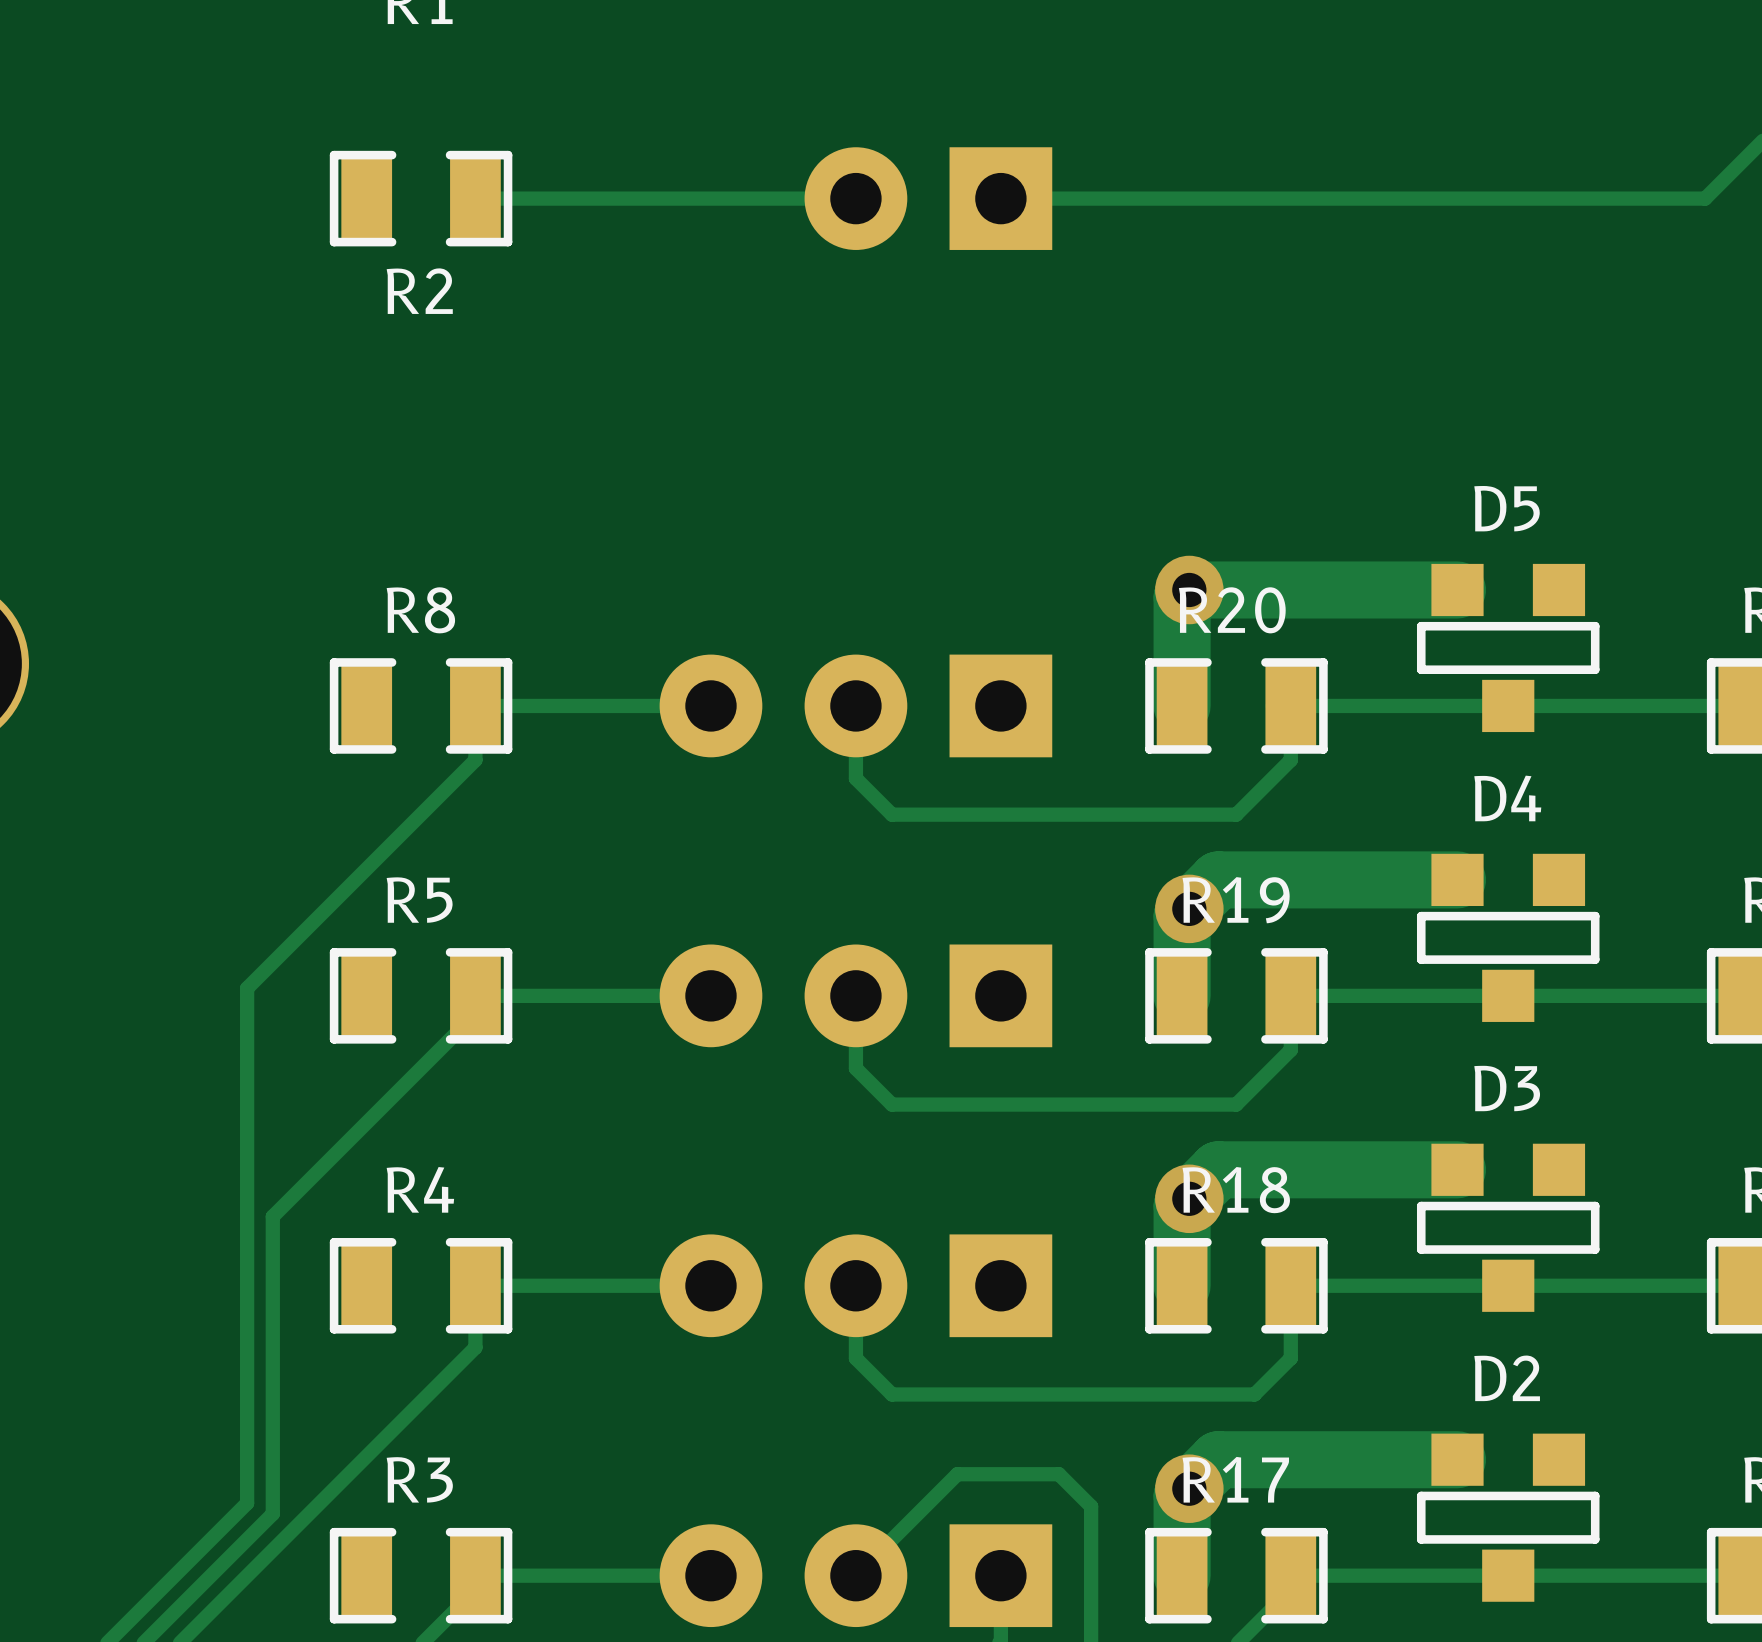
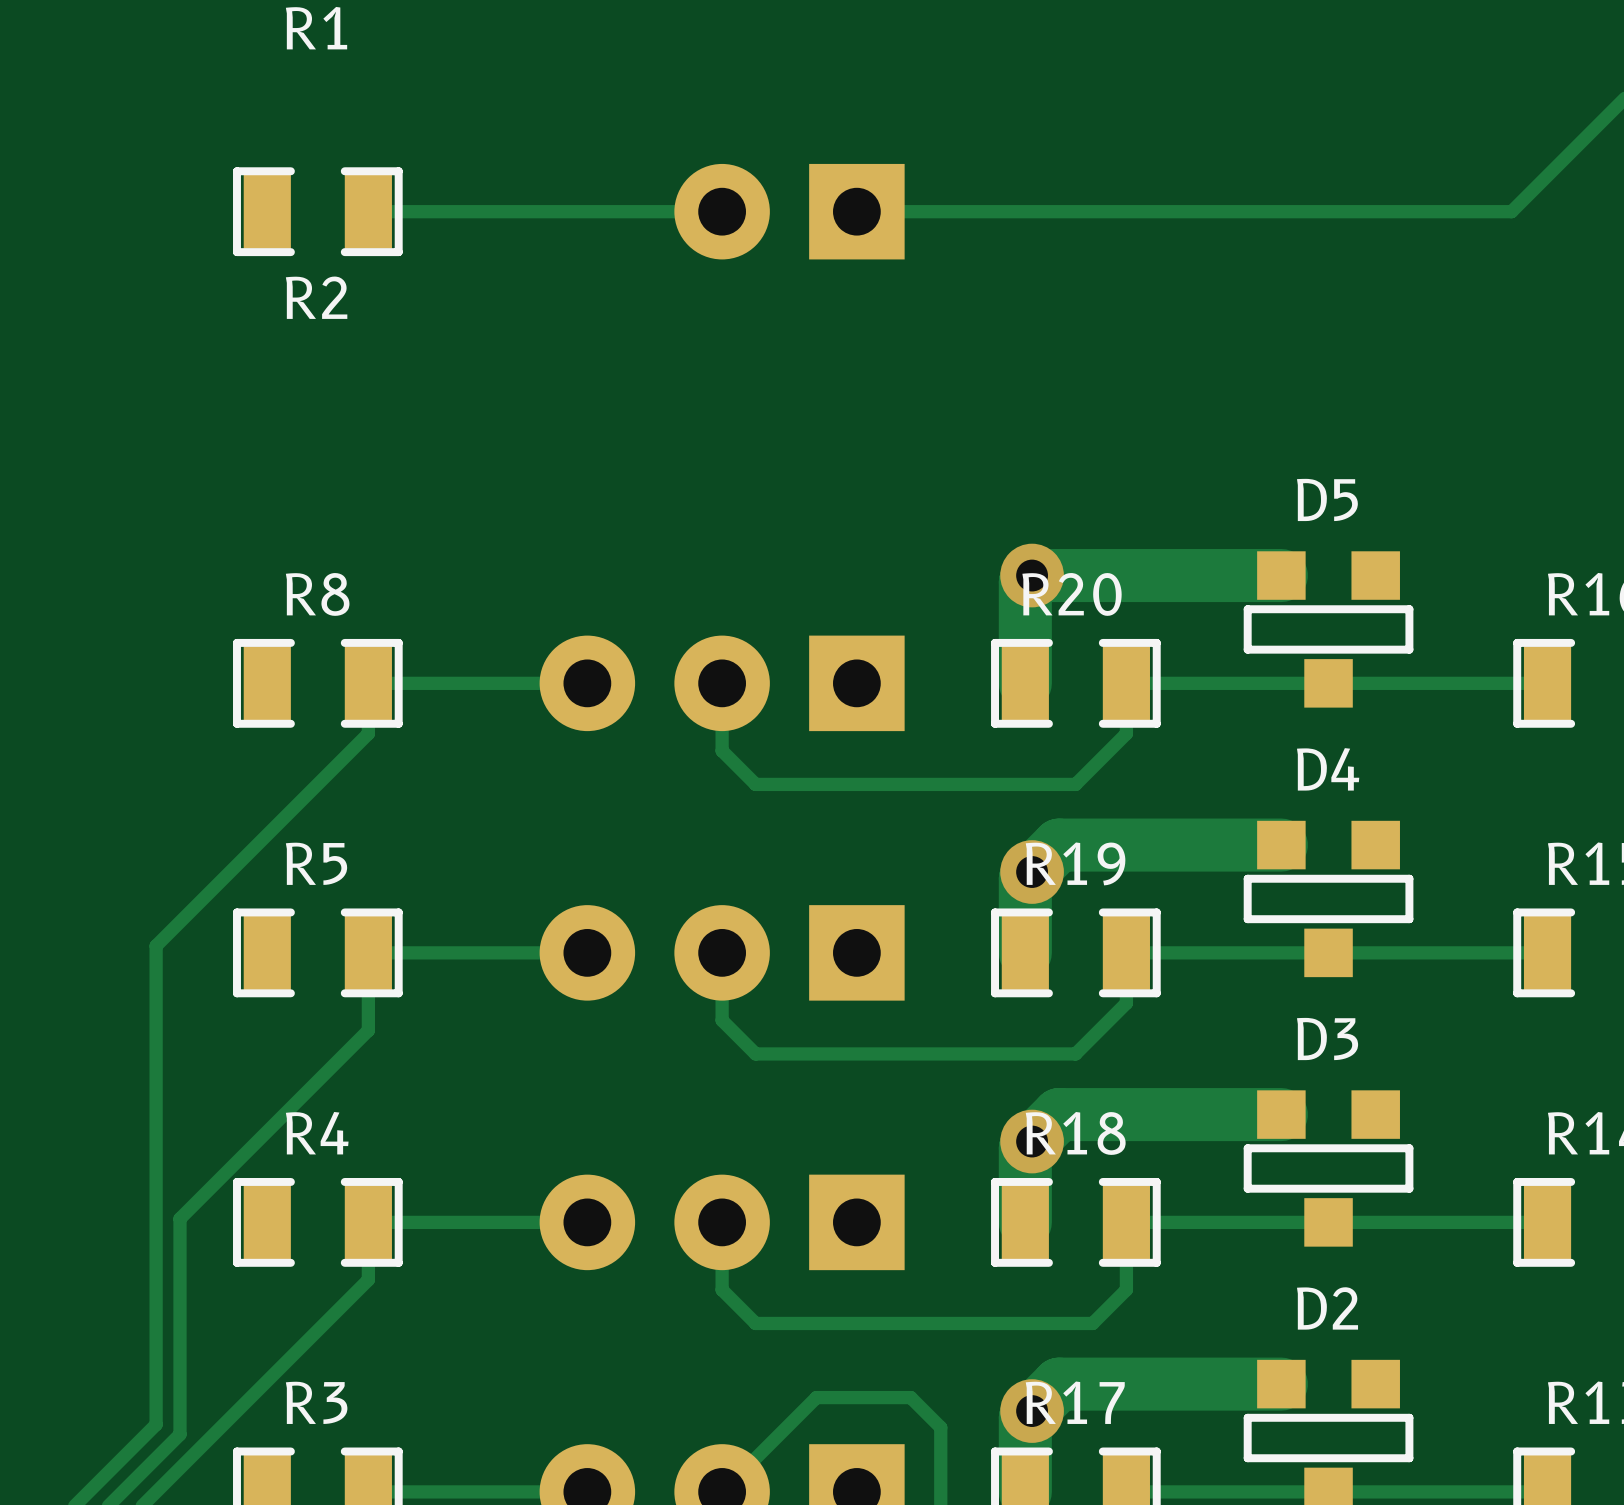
track: (475, 1013) (272, 1216) (272, 1281) -> (368, 969) (368, 1030) (180, 1218)

